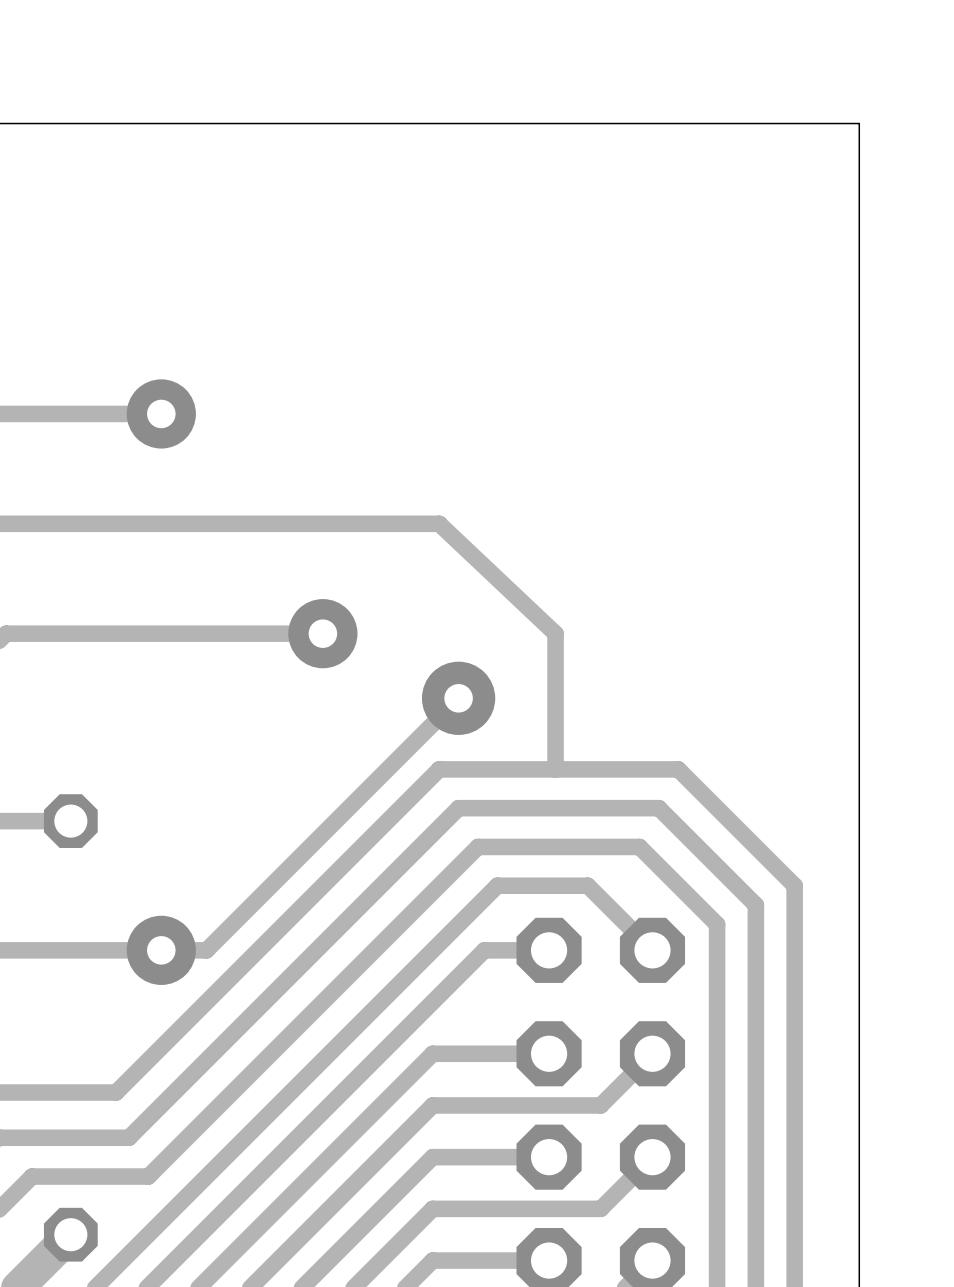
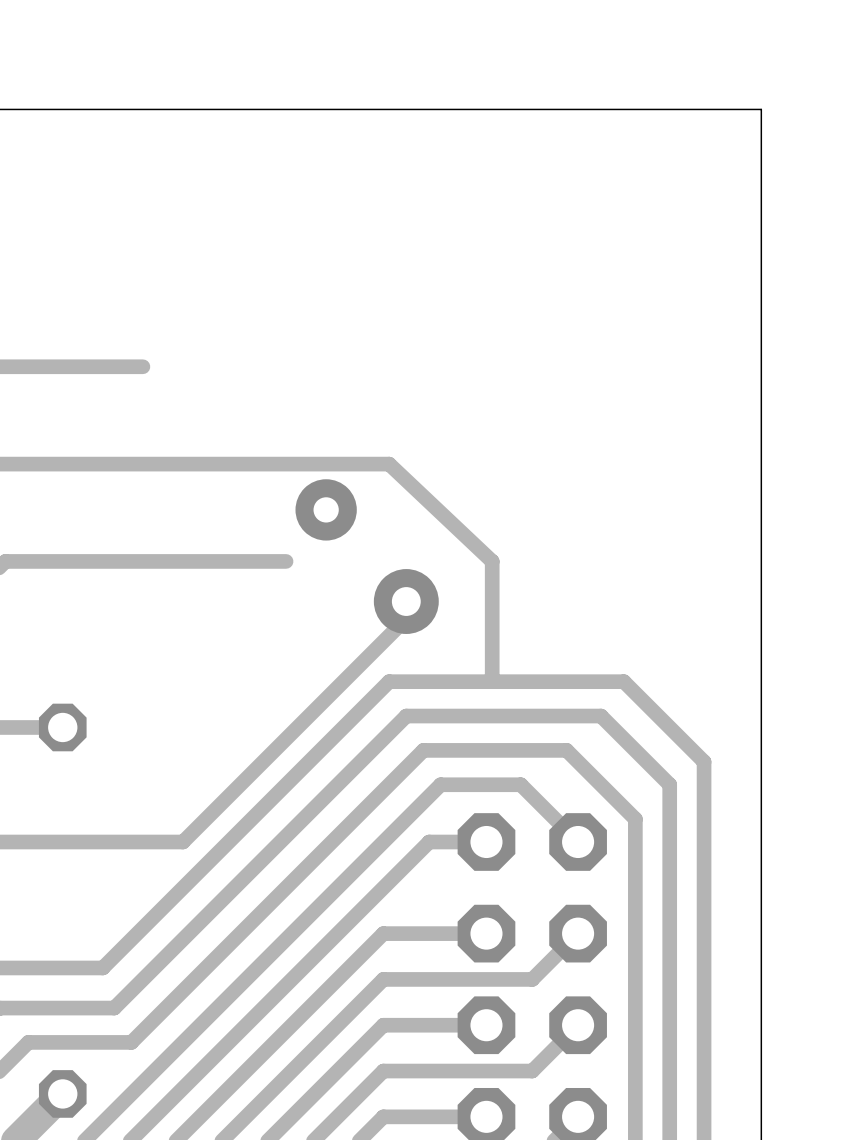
via: (161, 413) -> none
via position: (322, 633) -> (326, 509)
via position: (458, 698) -> (406, 601)
track: (678, 769) (794, 885) -> (600, 681) (623, 681) (704, 761) (704, 784)
track: (658, 808) (755, 905) -> (583, 716) (600, 716) (669, 784) (669, 801)
via: (161, 950) -> none

